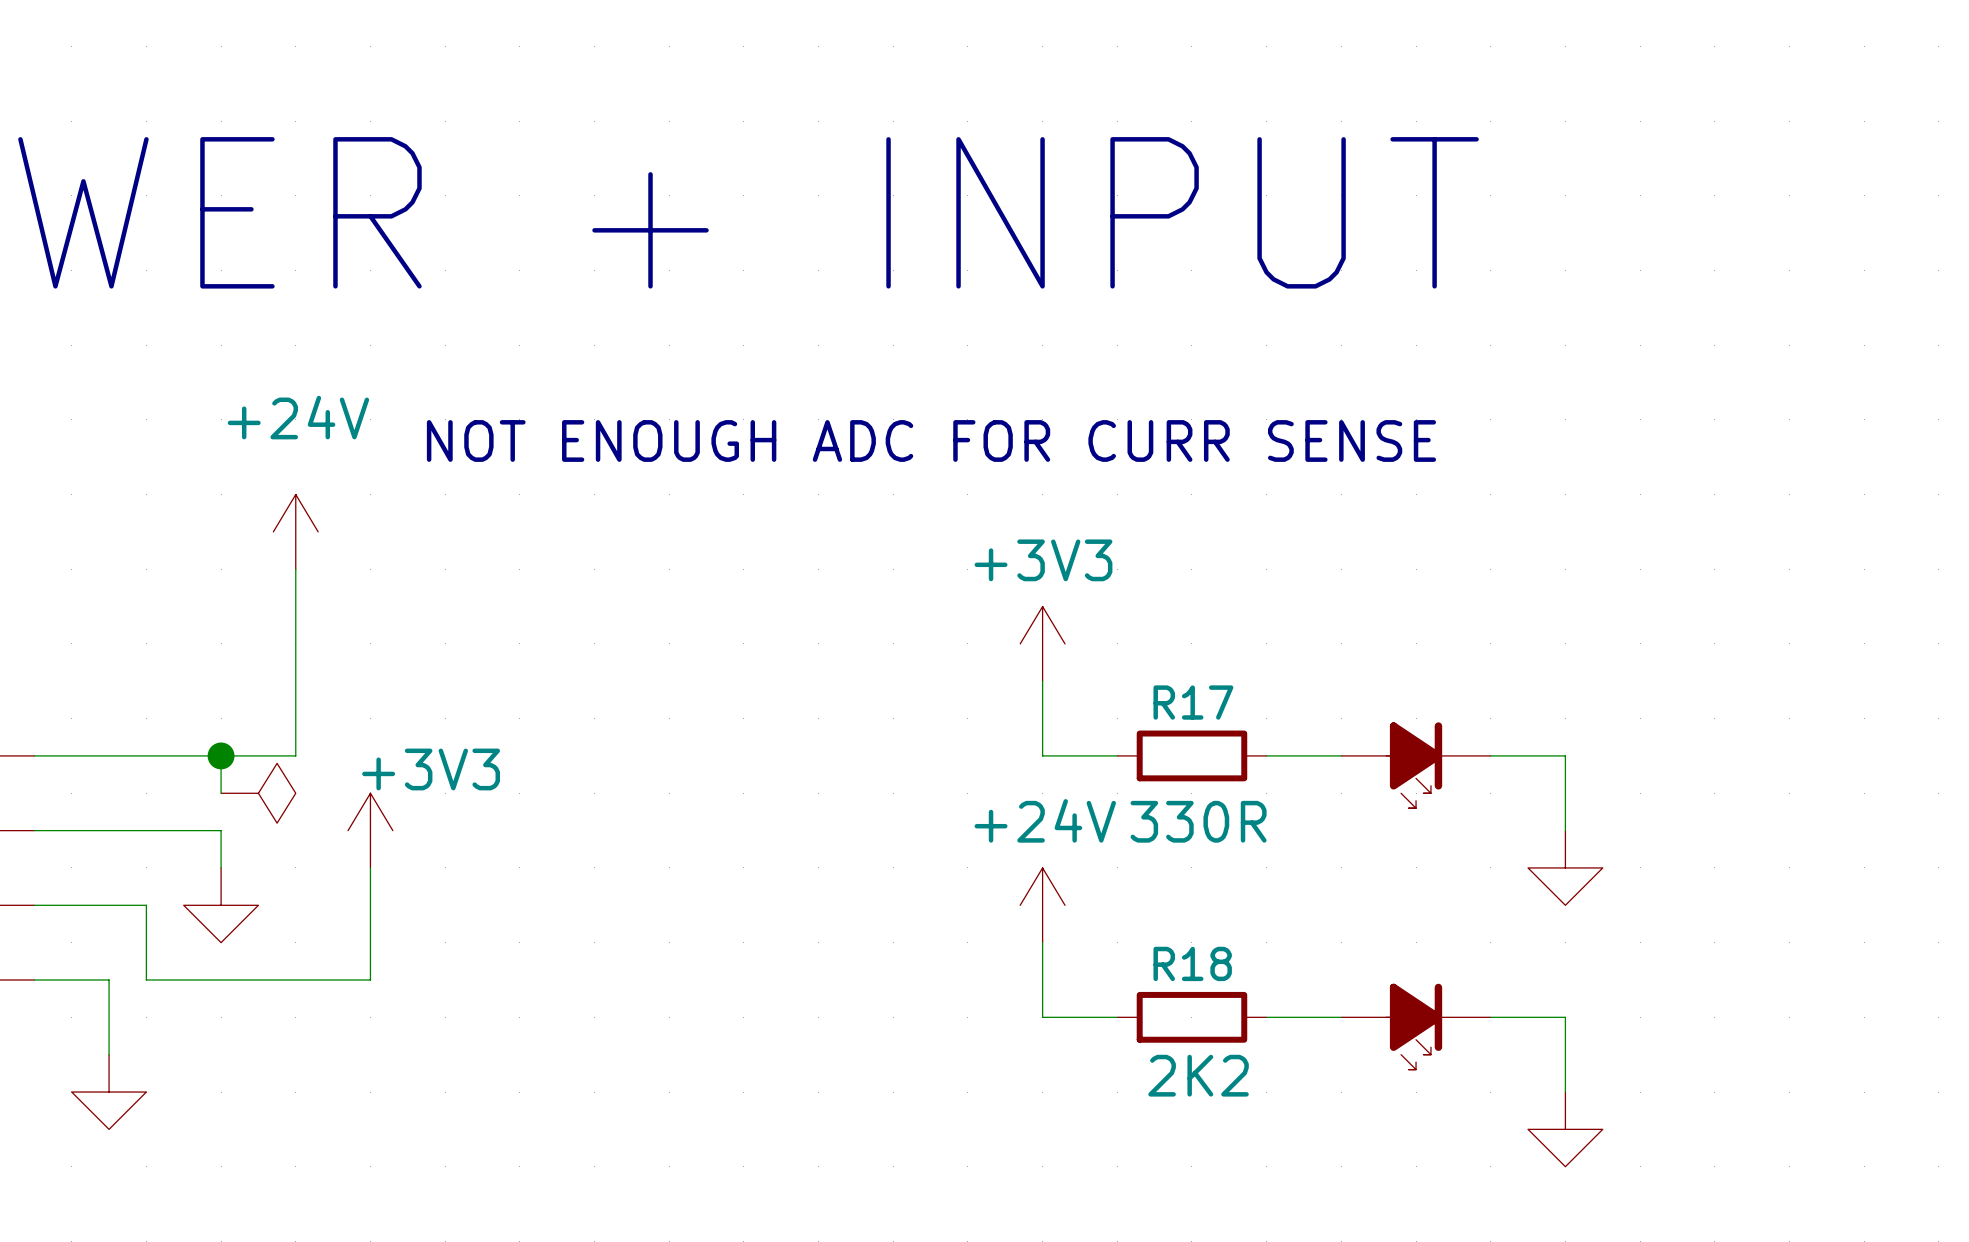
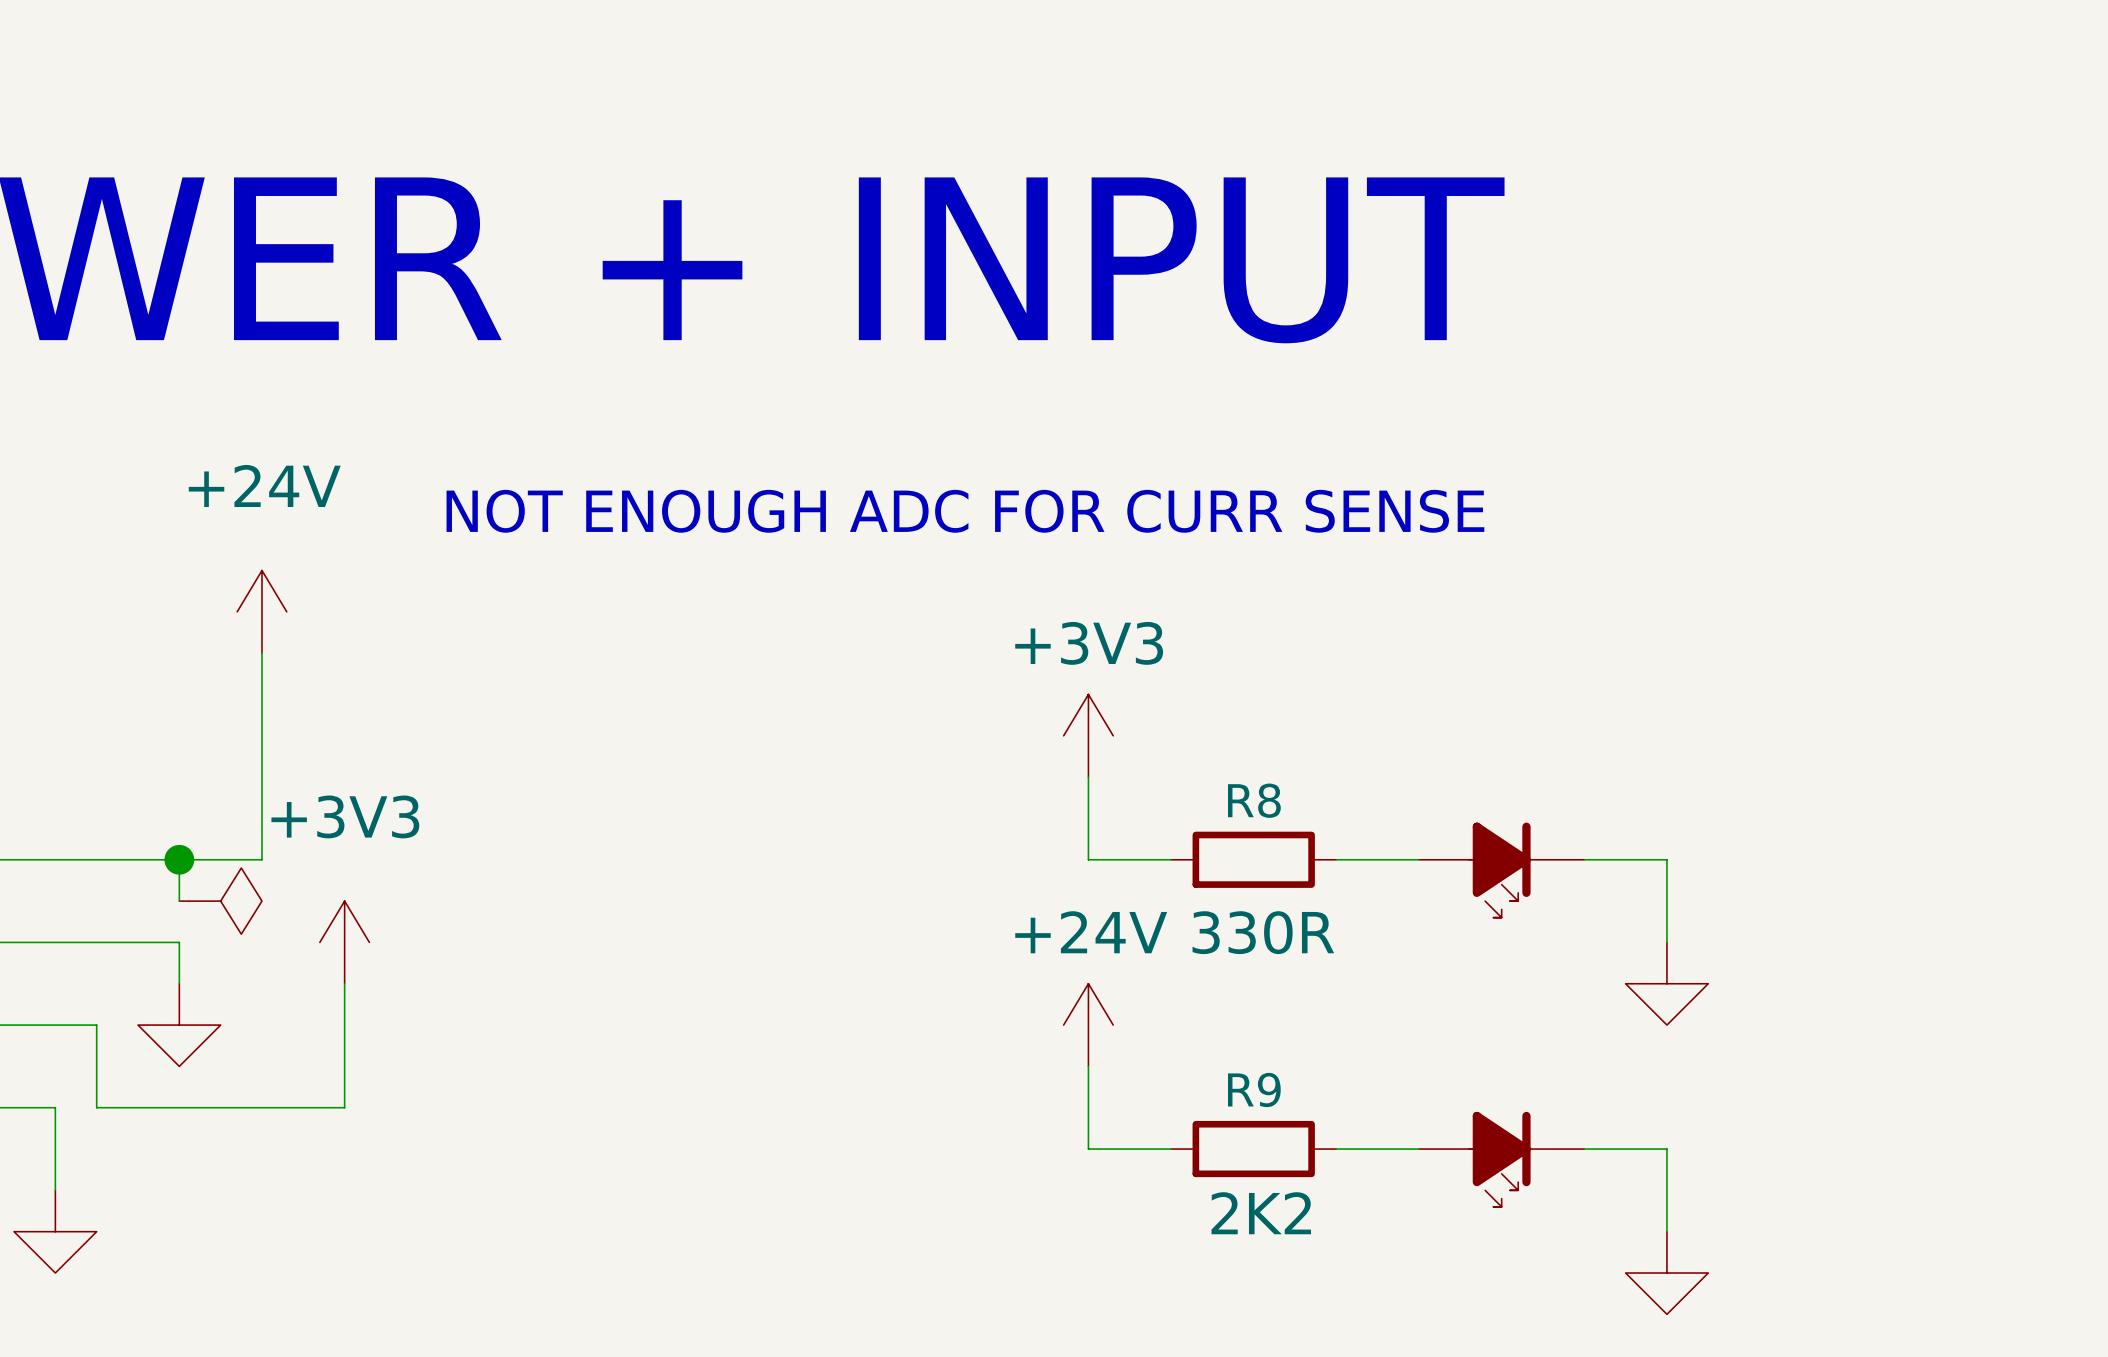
R17 name: R17 (1193, 702) -> R8 (1254, 800)
power symbol text position: +3V3 (431, 769) -> +3V3 (345, 816)
R18 name: R18 (1192, 963) -> R9 (1254, 1089)

